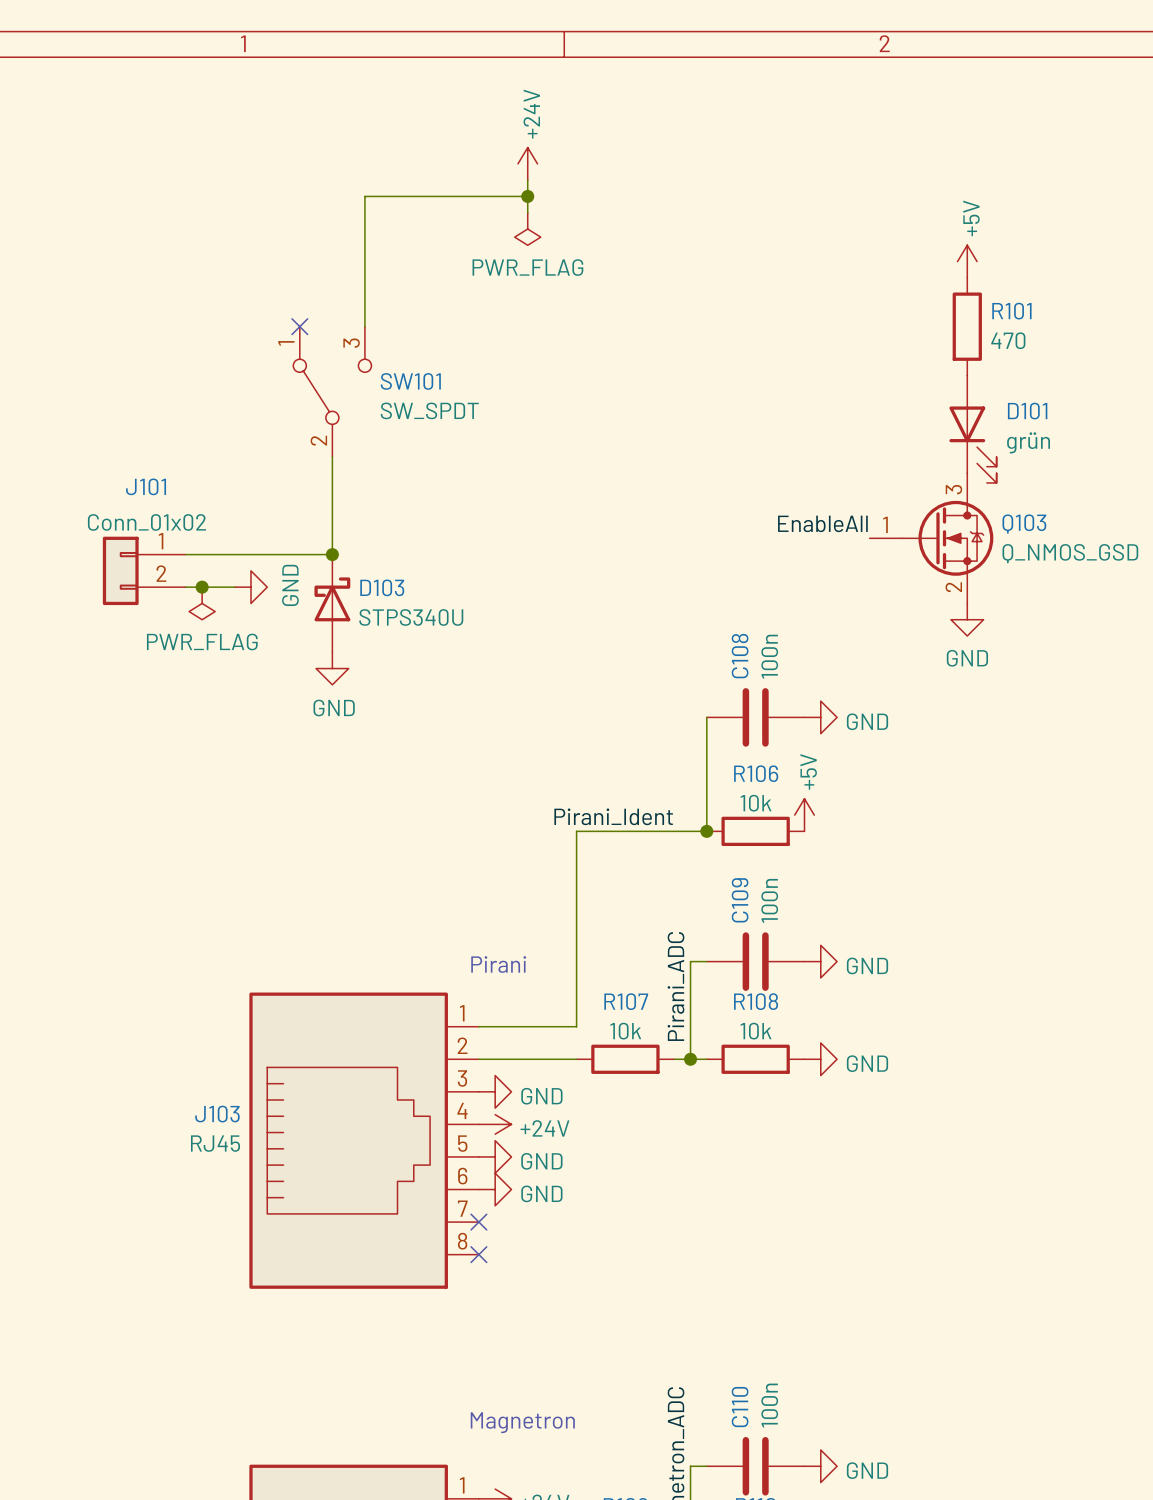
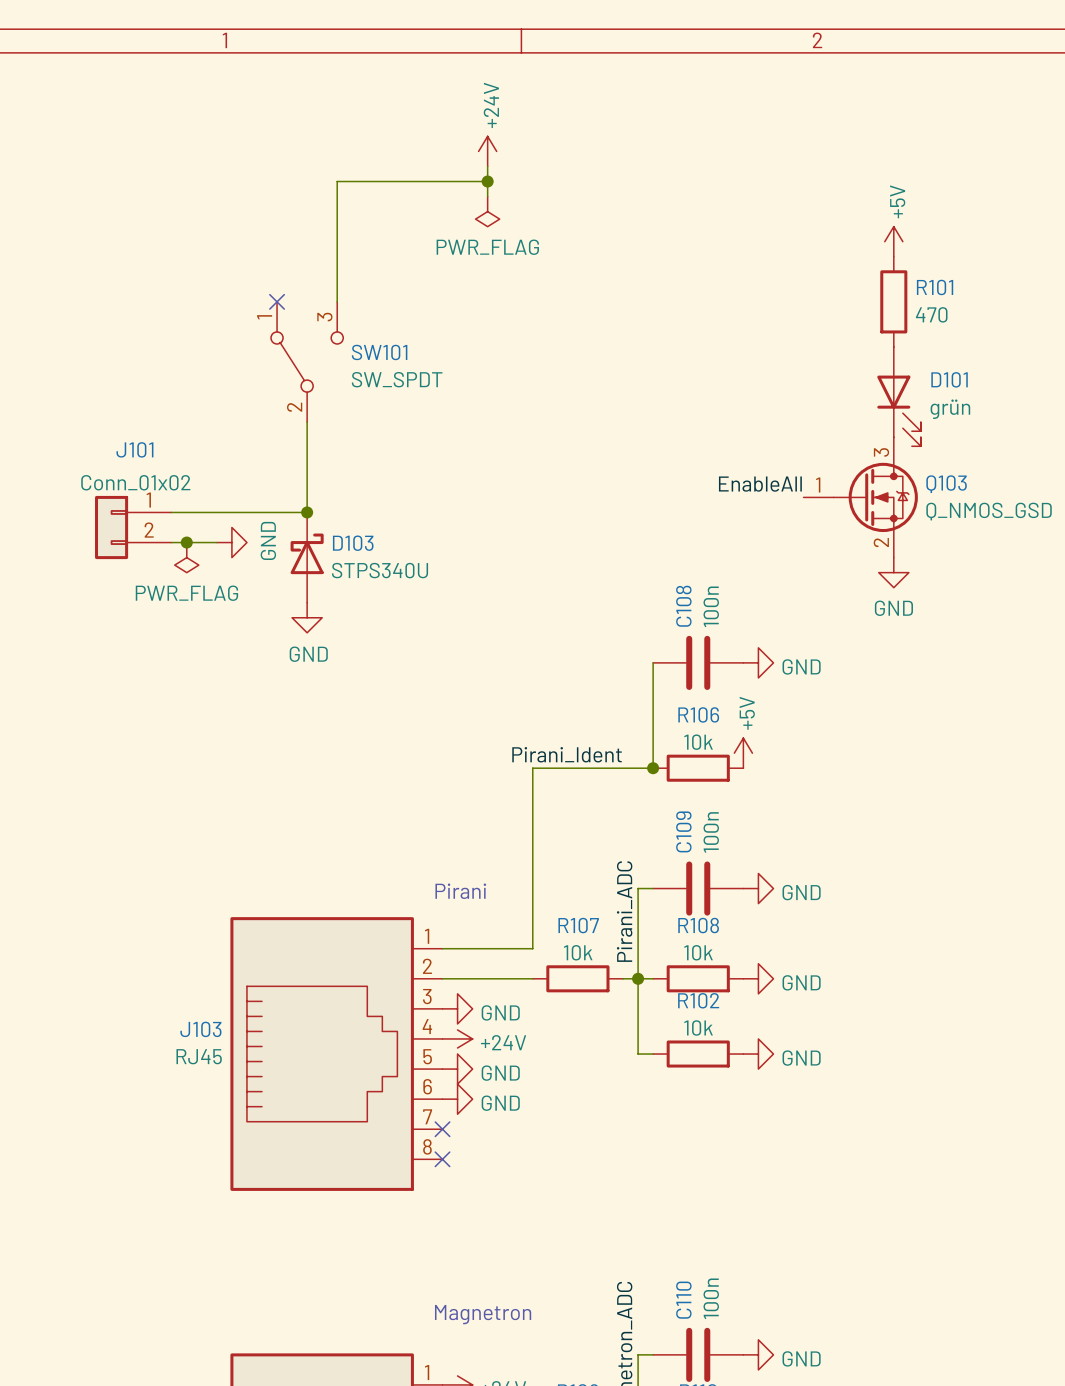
wire: none -> (638, 978) (638, 1054) (653, 1054)
R102: none -> 10k (698, 1054)
power symbol: none -> GND (758, 1054)

